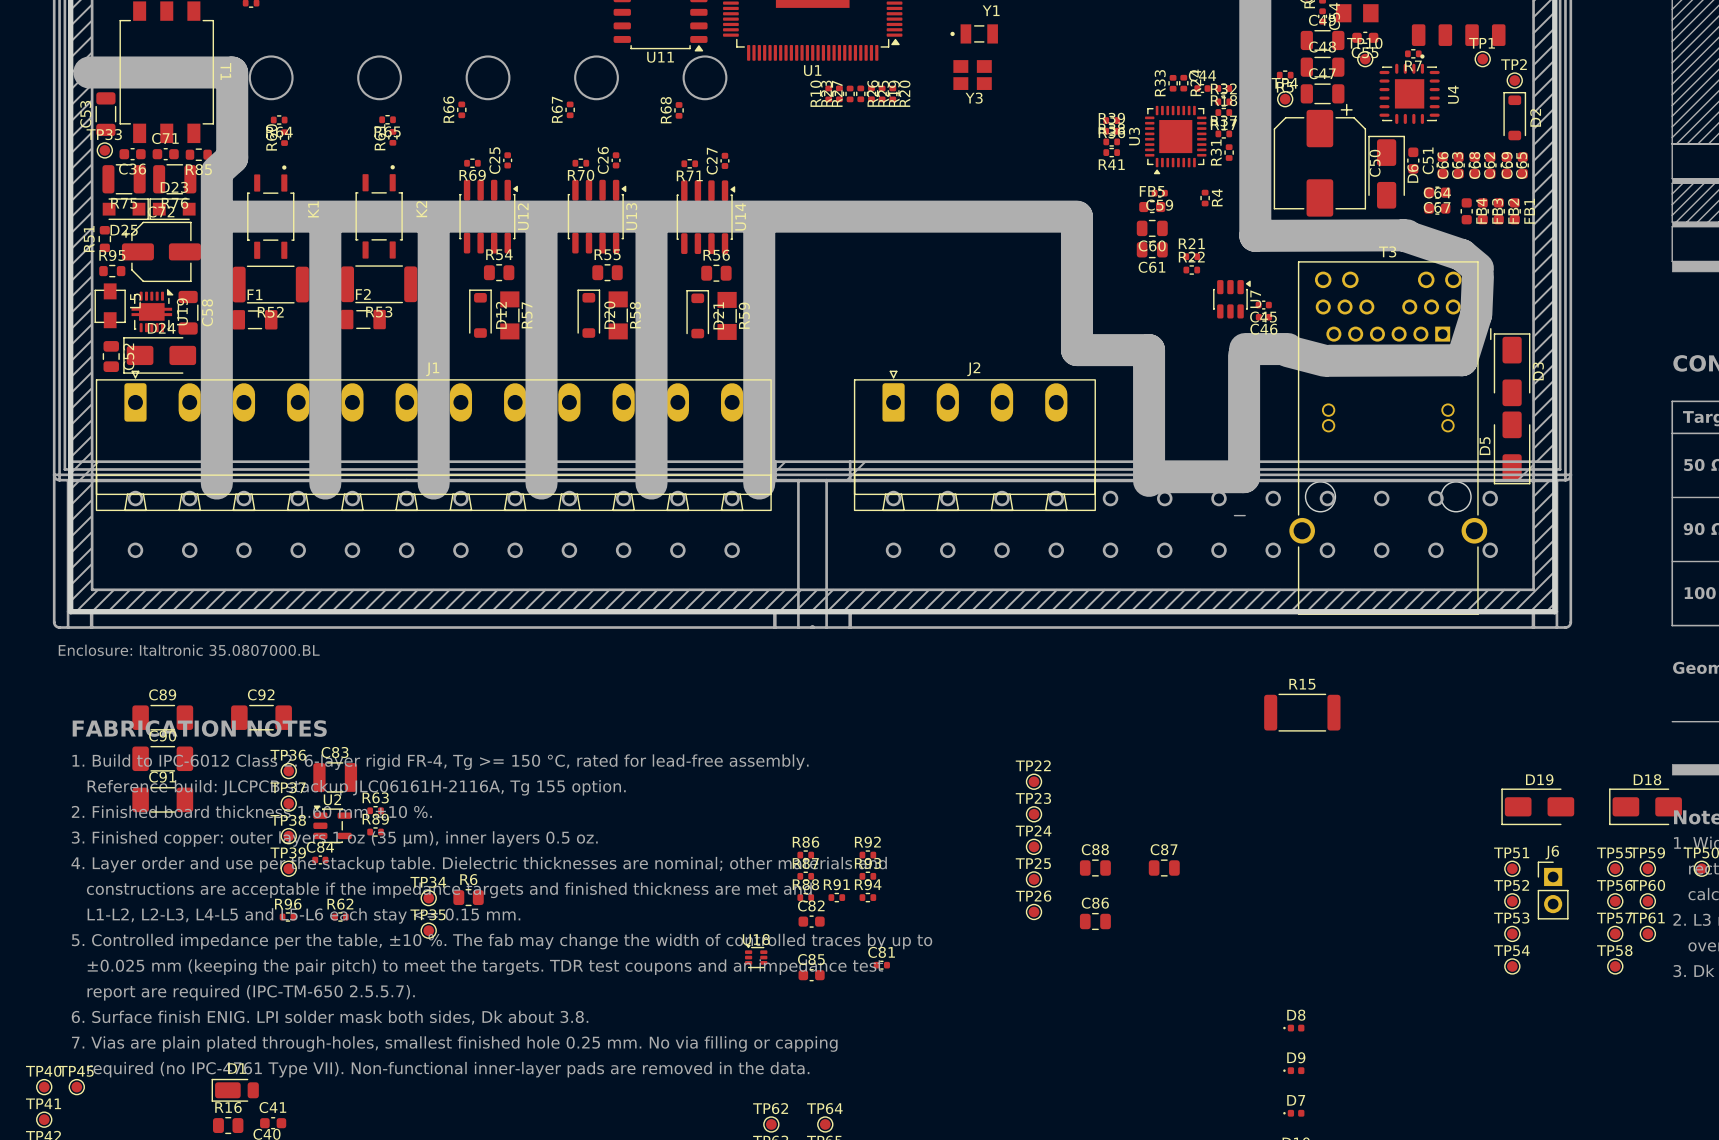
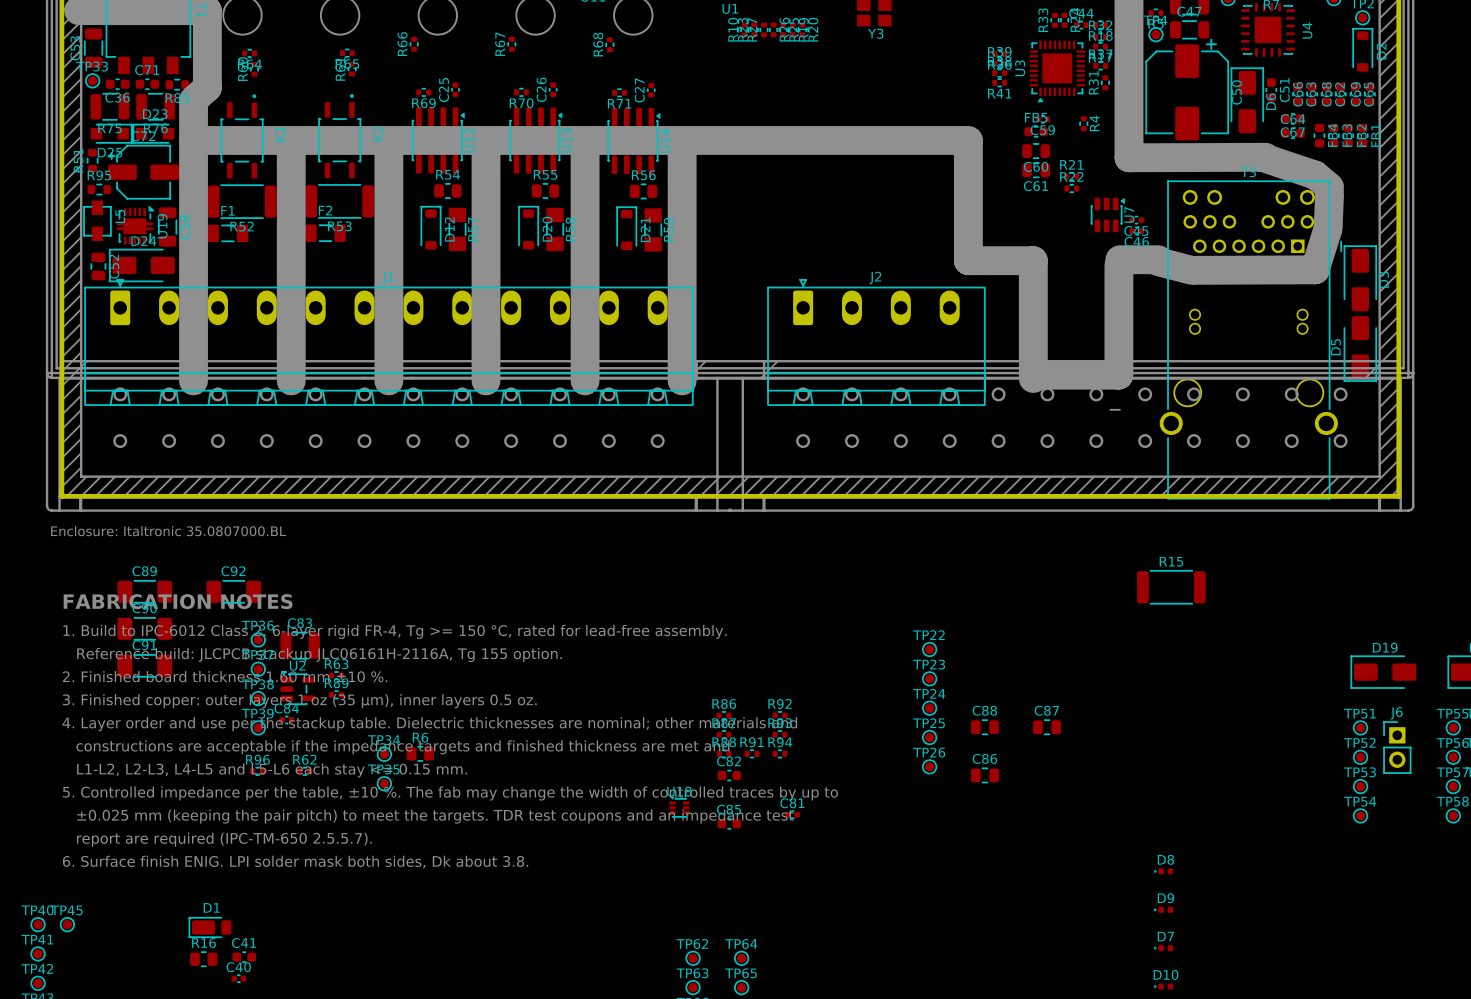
text: 7. Vias are plain plated through-holes, smallest finished hole 0.25 mm. No via filling or capping (454, 1044) -> none
text: required (no IPC-4761 Type VII). Non-functional inner-layer pads are removed in the data. (448, 1069) -> none

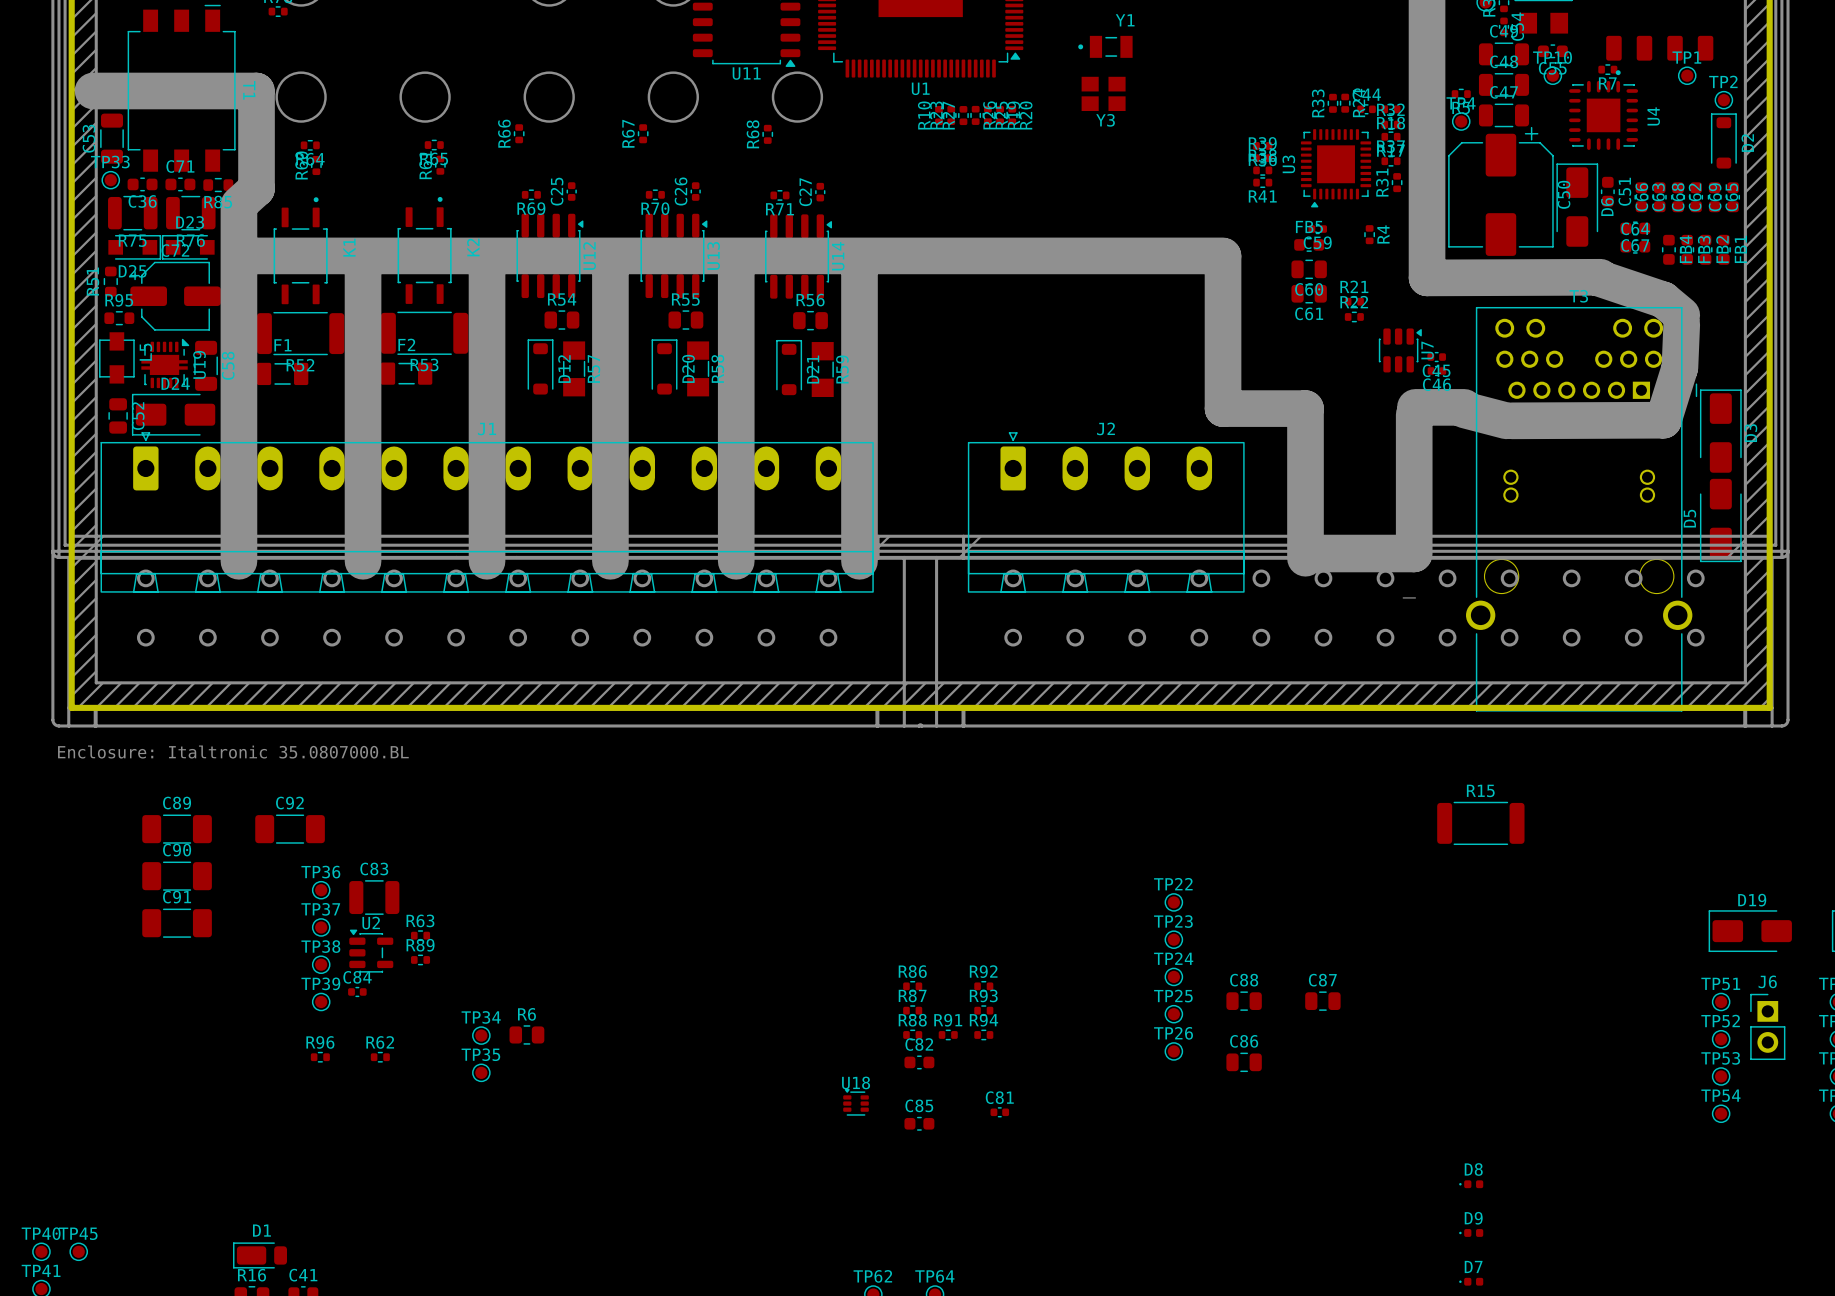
text: FABRICATION NOTES (178, 601) -> none
text: 1. Build to IPC-6012 Class 2. 6-layer rigid FR-4, Tg >= 150 °C, rated for lead-free assembly. (395, 631) -> none
text: Reference build: JLCPCB stackup JLC06161H-2116A, Tg 155 option. (319, 654) -> none
text: 2. Finished board thickness 1.60 mm ±10 %. (225, 676) -> none
text: 3. Finished copper: outer layers 1 oz (35 µm), inner layers 0.5 oz. (299, 701) -> none
text: 4. Layer order and use per the stackup table. Dielectric thicknesses are nominal; other materials and (429, 724) -> none
text: constructions are acceptable if the impedance targets and finished thickness are met and (402, 747) -> none
text: L1-L2, L2-L3, L4-L5 and L5-L6 each stay <= 0.15 mm. (272, 770) -> none
text: 5. Controlled impedance per the table, ±10 %. The fab may change the width of controlled traces by up to (450, 793) -> none
text: ±0.025 mm (keeping the pair pitch) to meet the targets. TDR test coupons and an impedance test (435, 816) -> none
text: report are required (IPC-TM-650 2.5.5.7). (224, 839) -> none
text: 6. Surface finish ENIG. LPI solder mask both sides, Dk about 3.8. (295, 862) -> none

